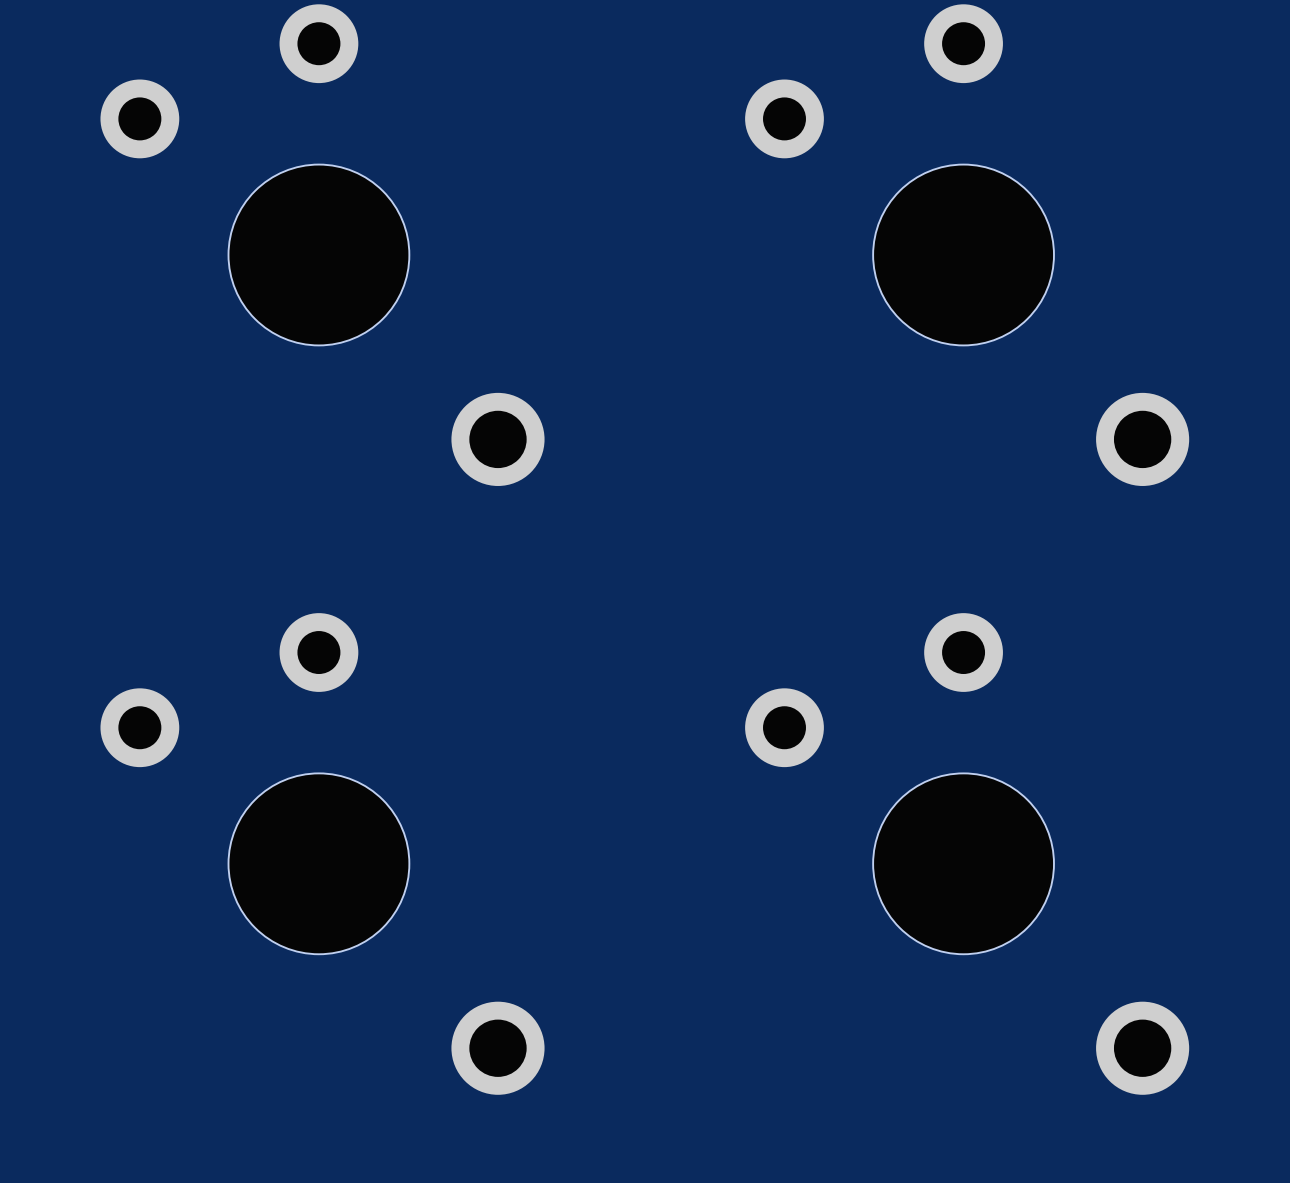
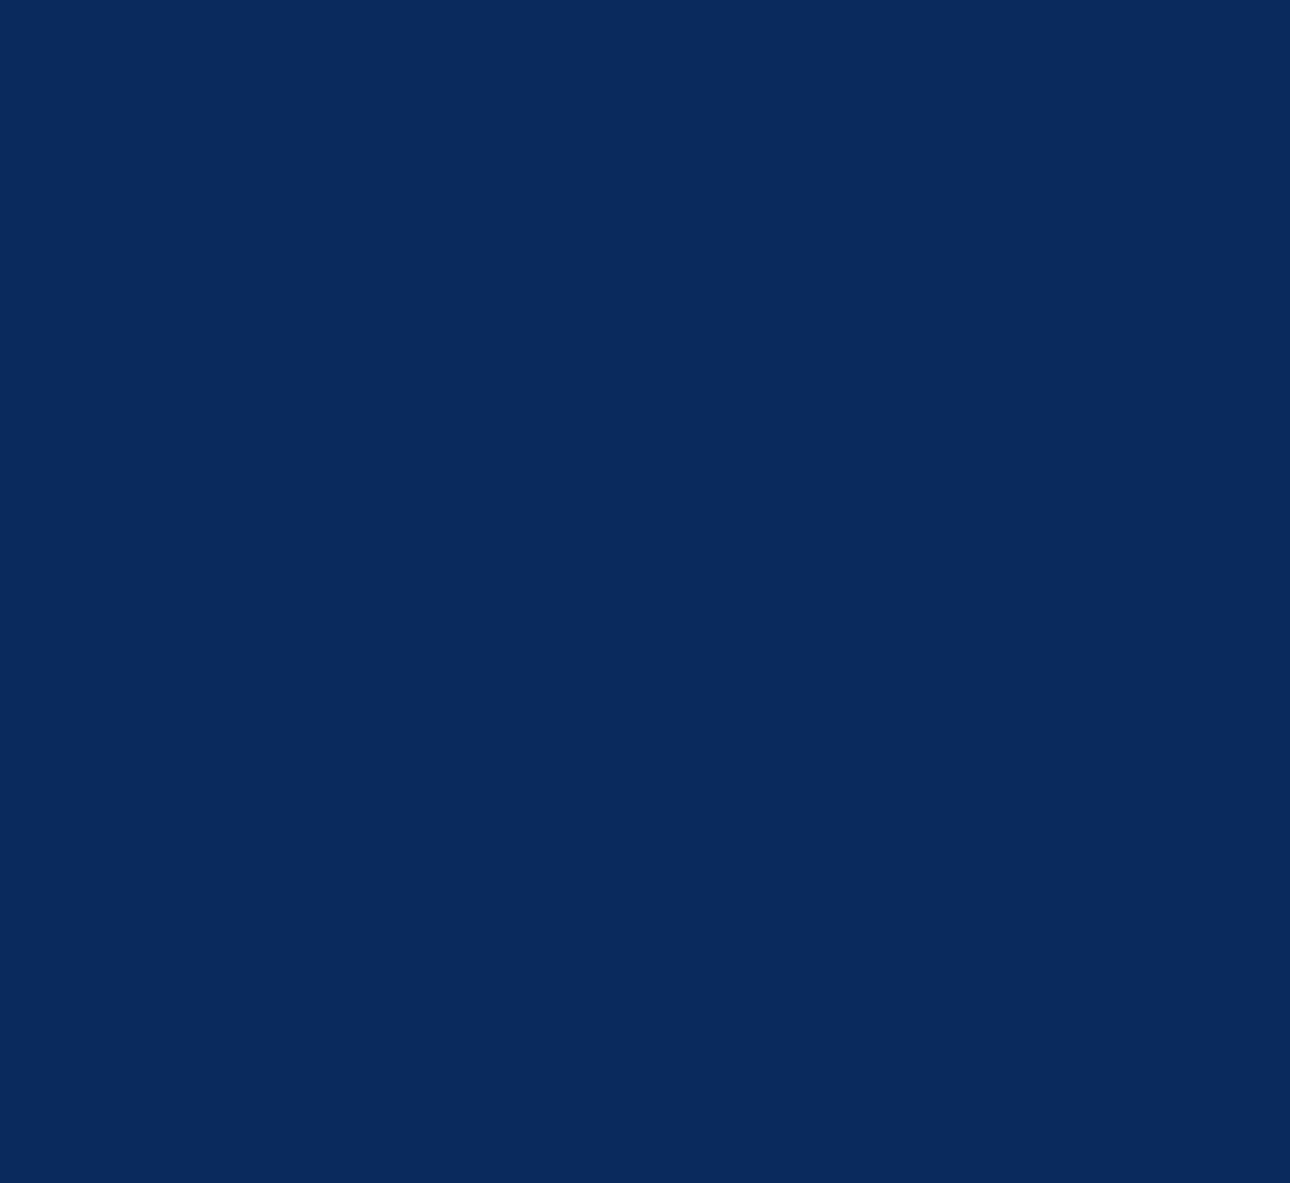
part: (322, 245) -> none
part: (967, 245) -> none
part: (322, 853) -> none
part: (967, 853) -> none

